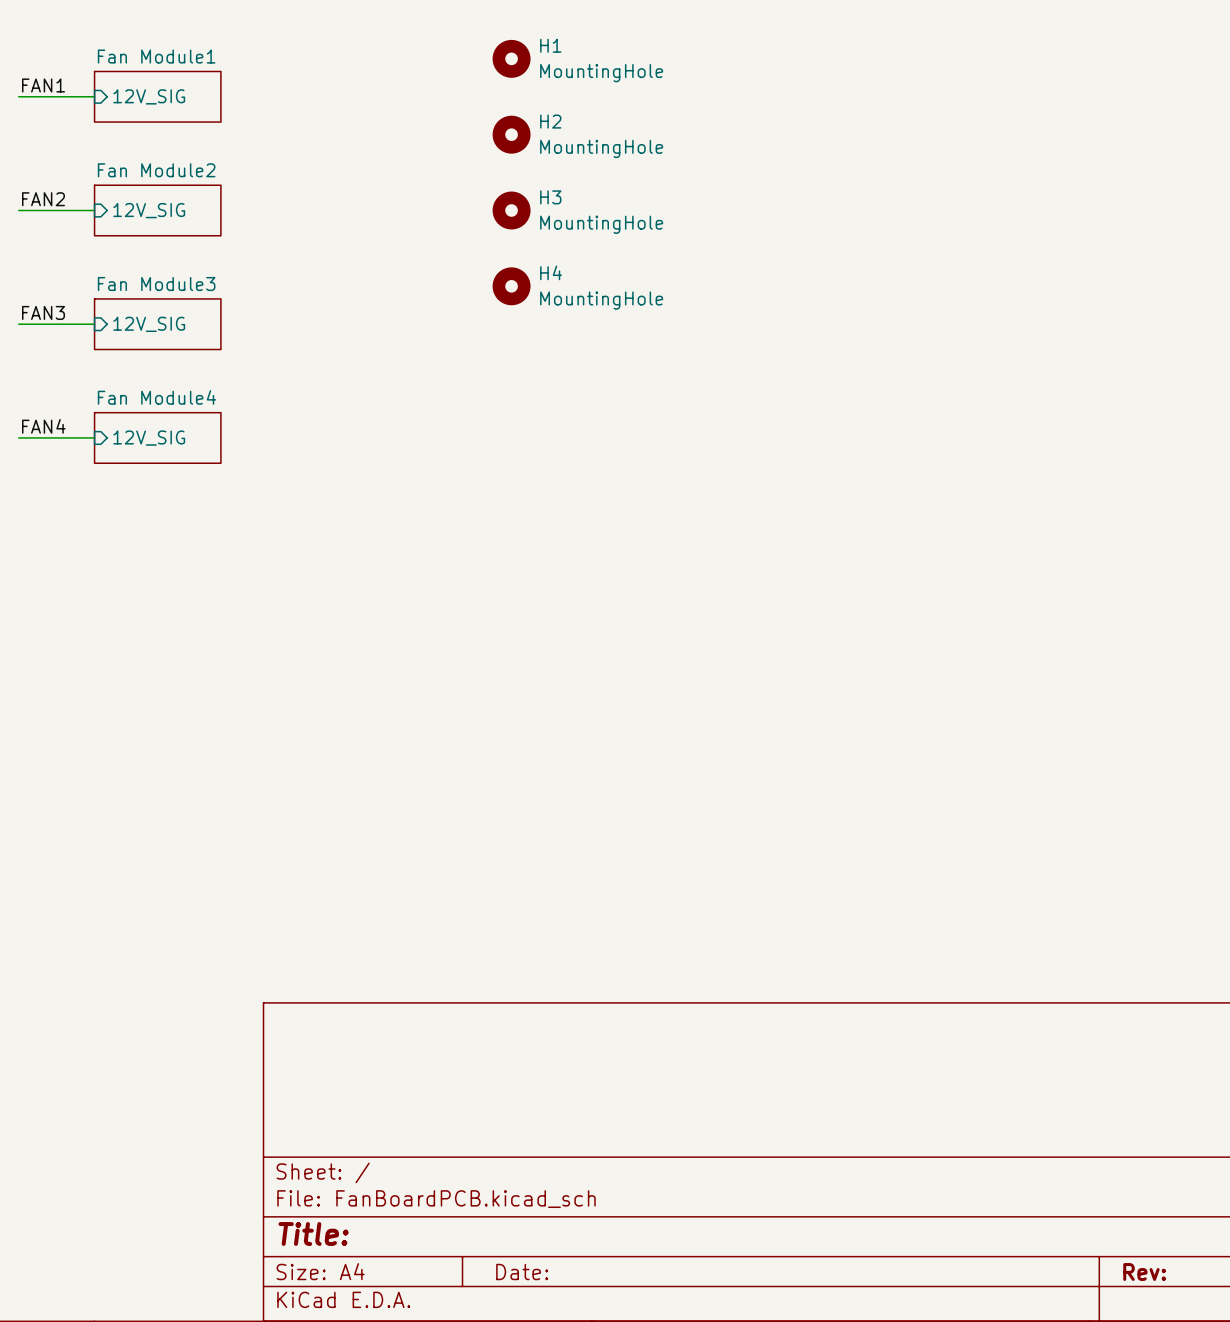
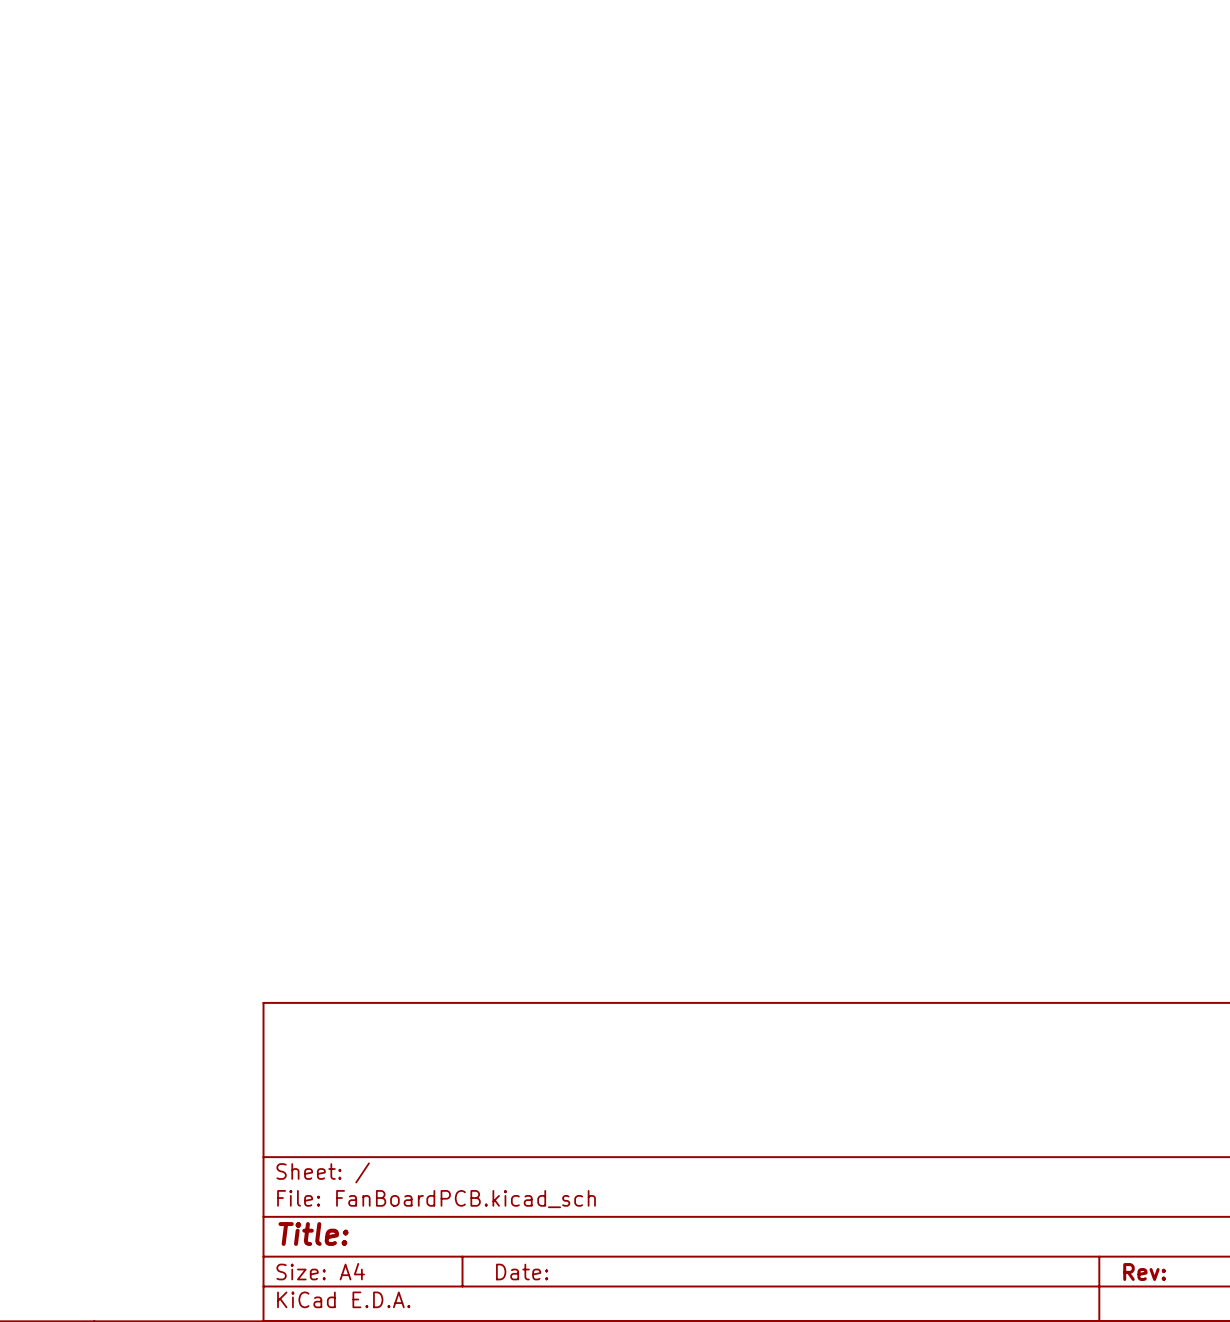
H1: MountingHole (511, 58) -> none
label: FAN1 (43, 85) -> none
wire: (18, 96) (94, 96) -> none
sheet pin: 12V_SIG (149, 96) -> none
sheet Fan Module1: (157, 96) -> none
H2: MountingHole (511, 134) -> none
label: FAN2 (43, 199) -> none
wire: (18, 210) (94, 210) -> none
sheet pin: 12V_SIG (149, 210) -> none
sheet Fan Module2: (157, 210) -> none
H3: MountingHole (511, 210) -> none
H4: MountingHole (511, 286) -> none
label: FAN3 (43, 312) -> none
wire: (18, 324) (94, 324) -> none
sheet pin: 12V_SIG (149, 324) -> none
sheet Fan Module3: (157, 324) -> none
label: FAN4 (43, 426) -> none
wire: (18, 437) (94, 437) -> none
sheet Fan Module4: (157, 437) -> none
sheet pin: 12V_SIG (149, 438) -> none

